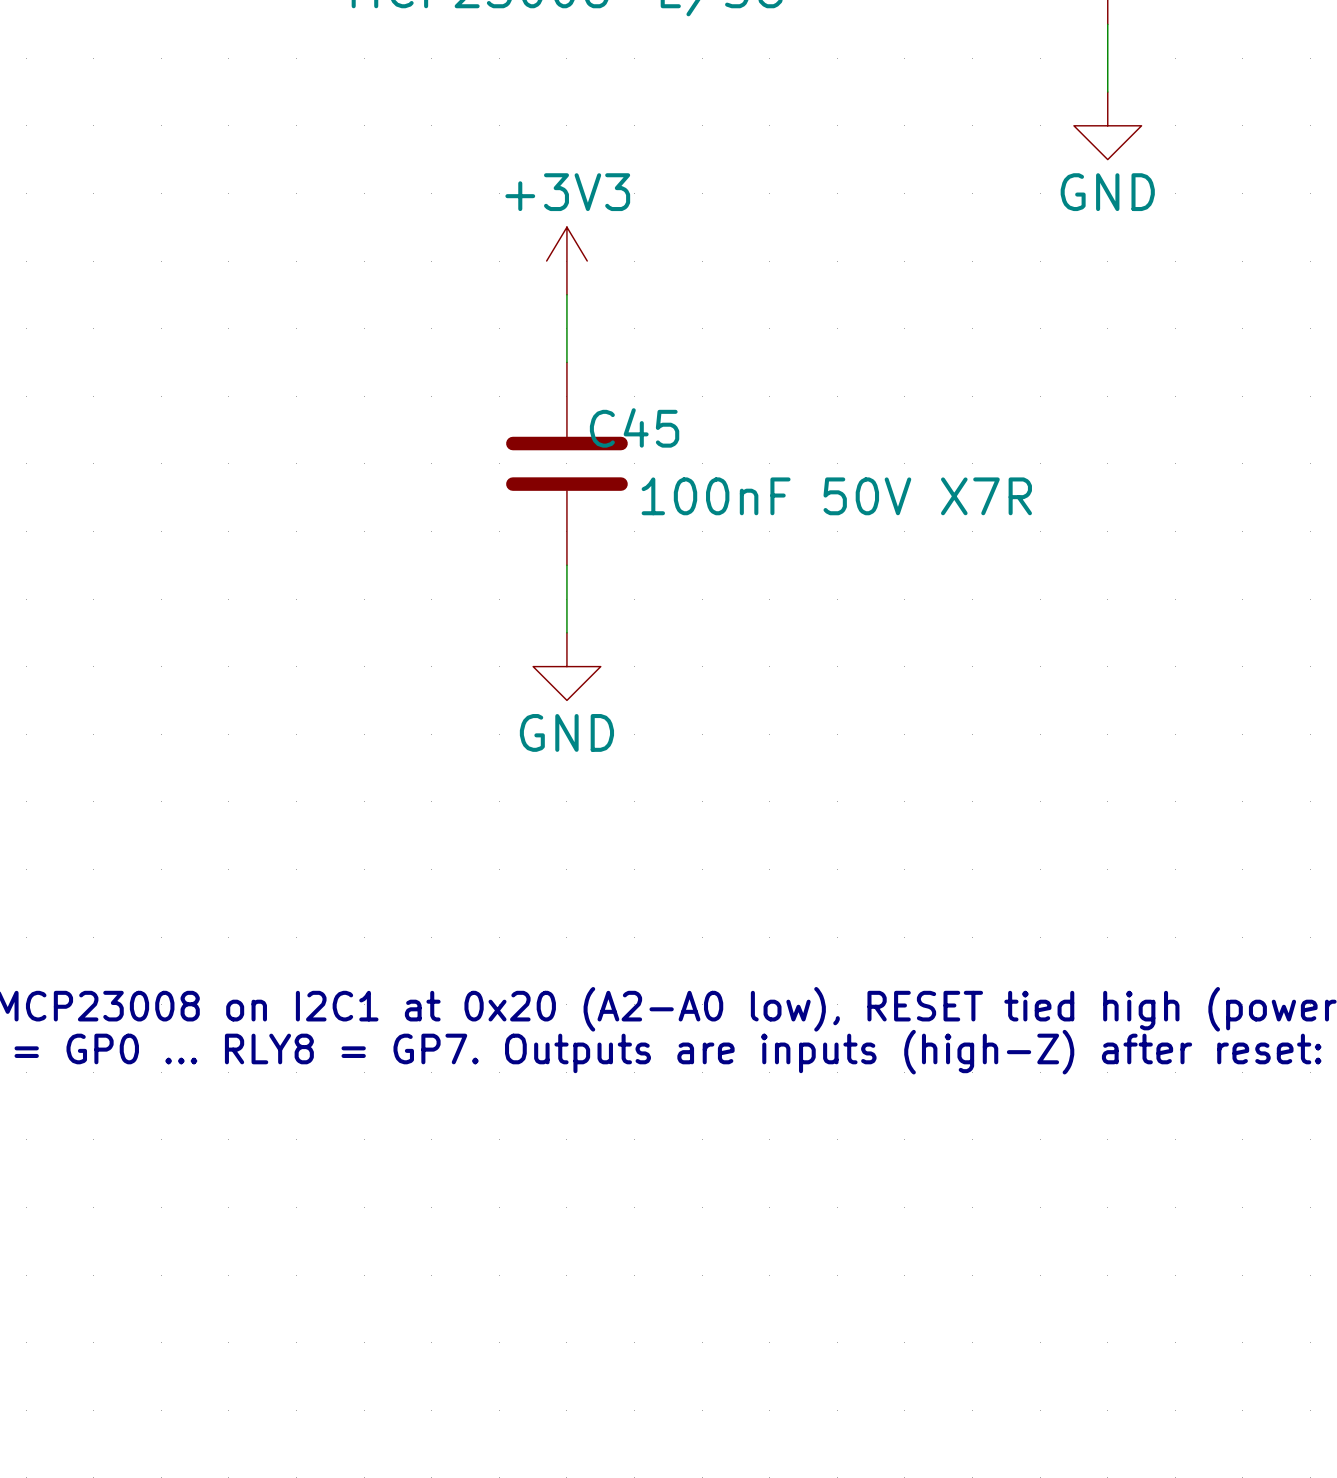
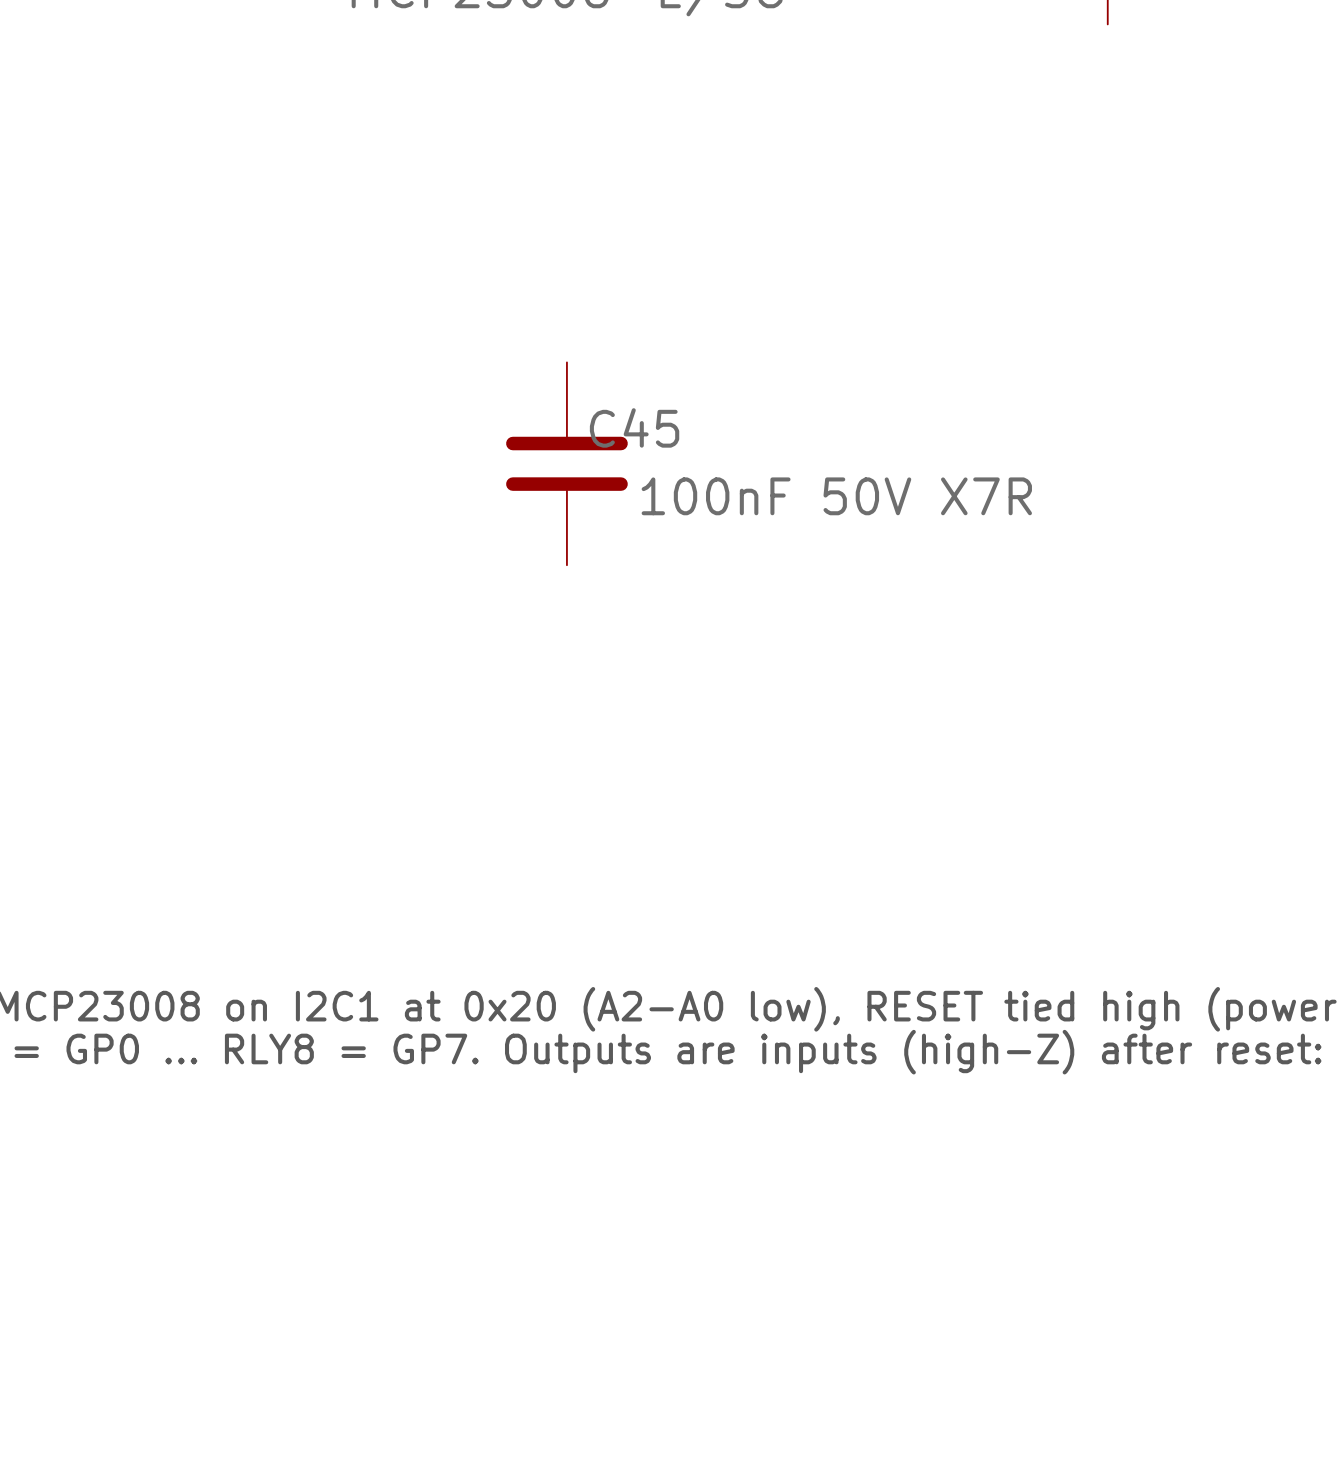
wire: (1107, 24) (1107, 92) -> none
power symbol: GND (1107, 125) -> none
power symbol: +3V3 (566, 261) -> none
wire: (566, 294) (566, 362) -> none
wire: (566, 565) (566, 632) -> none
power symbol: GND (566, 666) -> none

